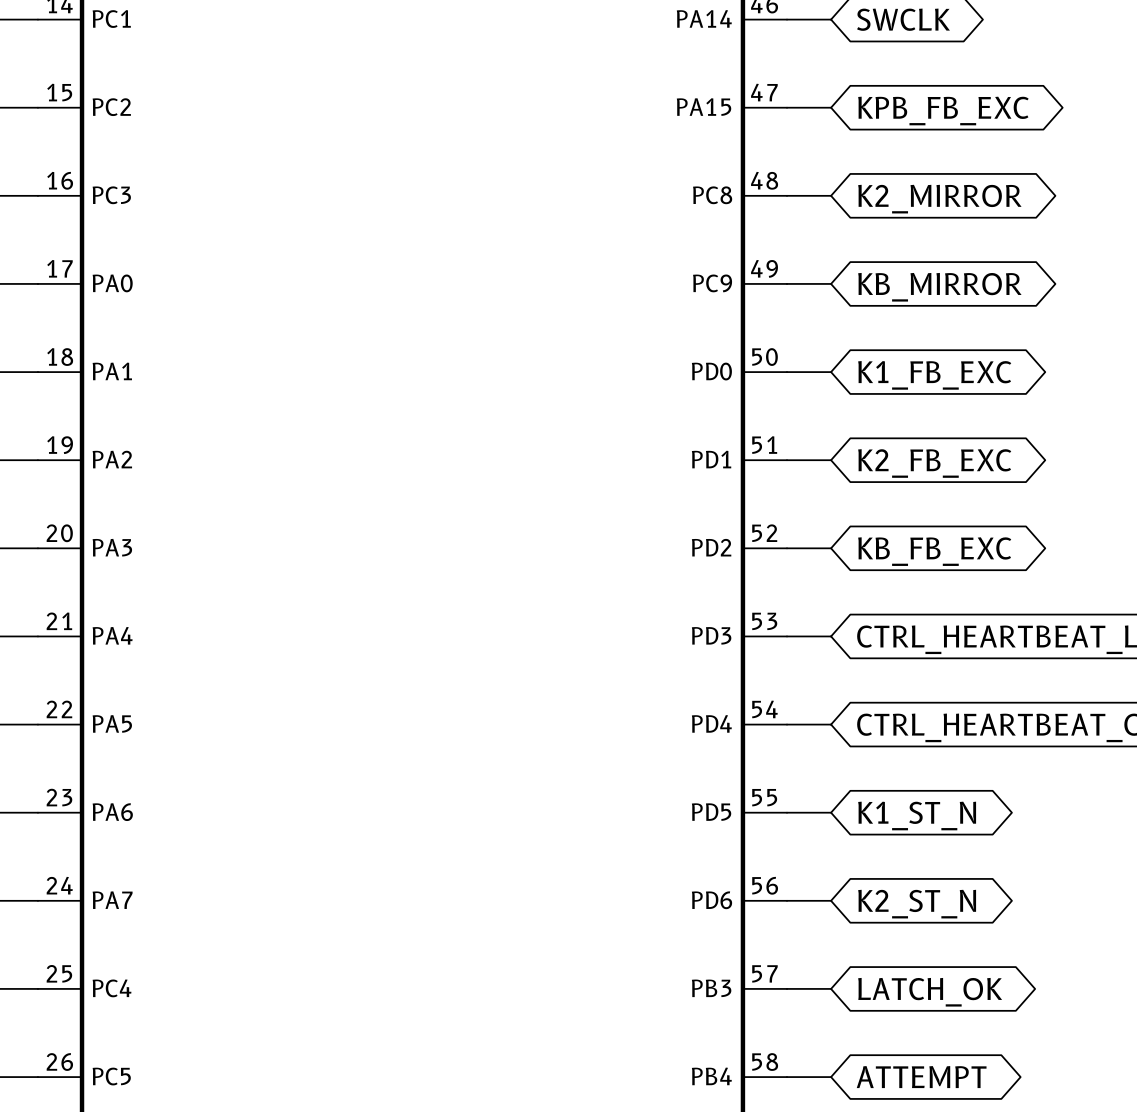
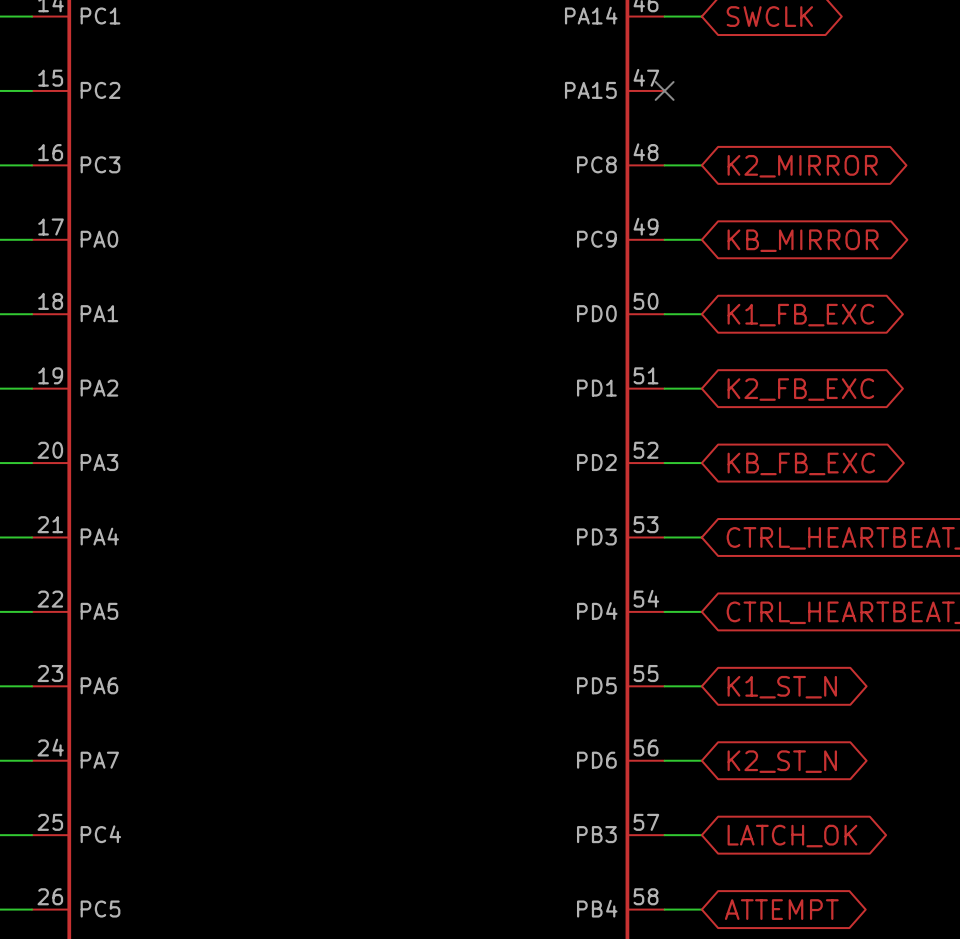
wire: (787, 107) (831, 107) -> none
no-connect mark: none -> (664, 90)
global label: KPB_FB_EXC (943, 111) -> none

